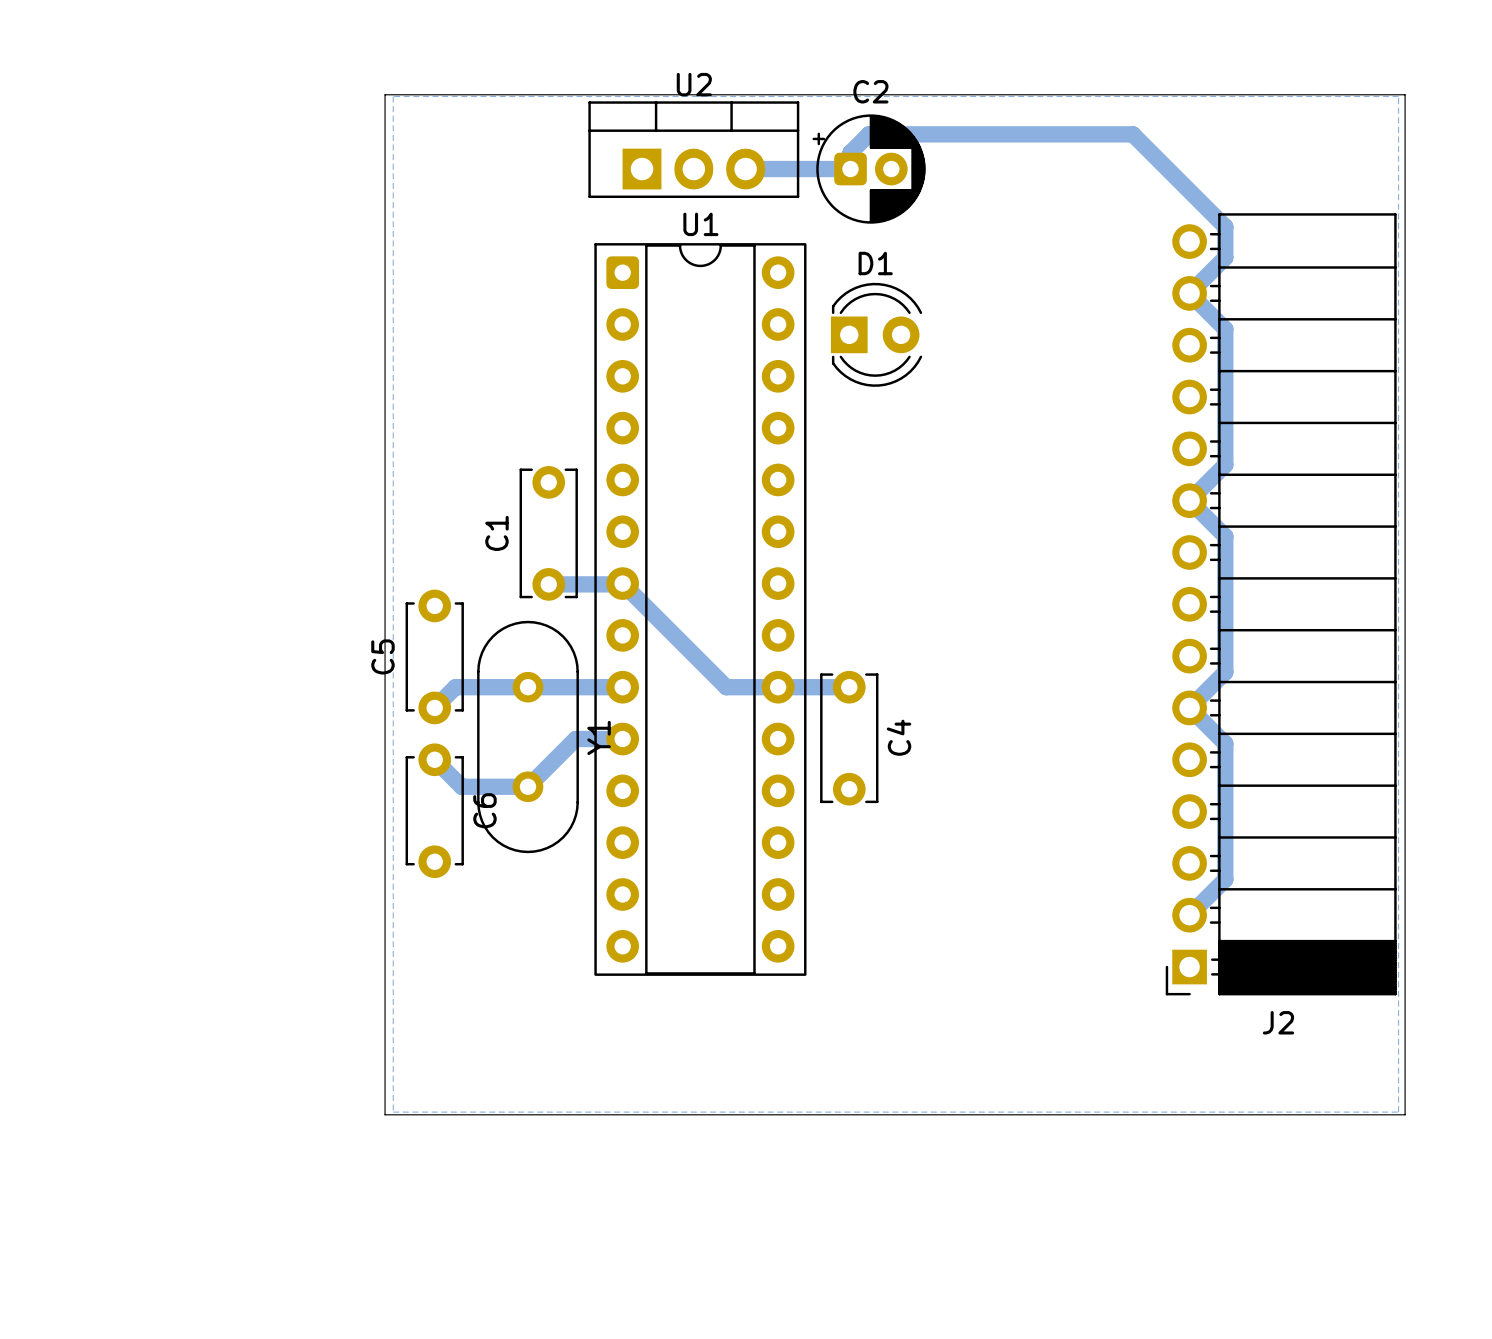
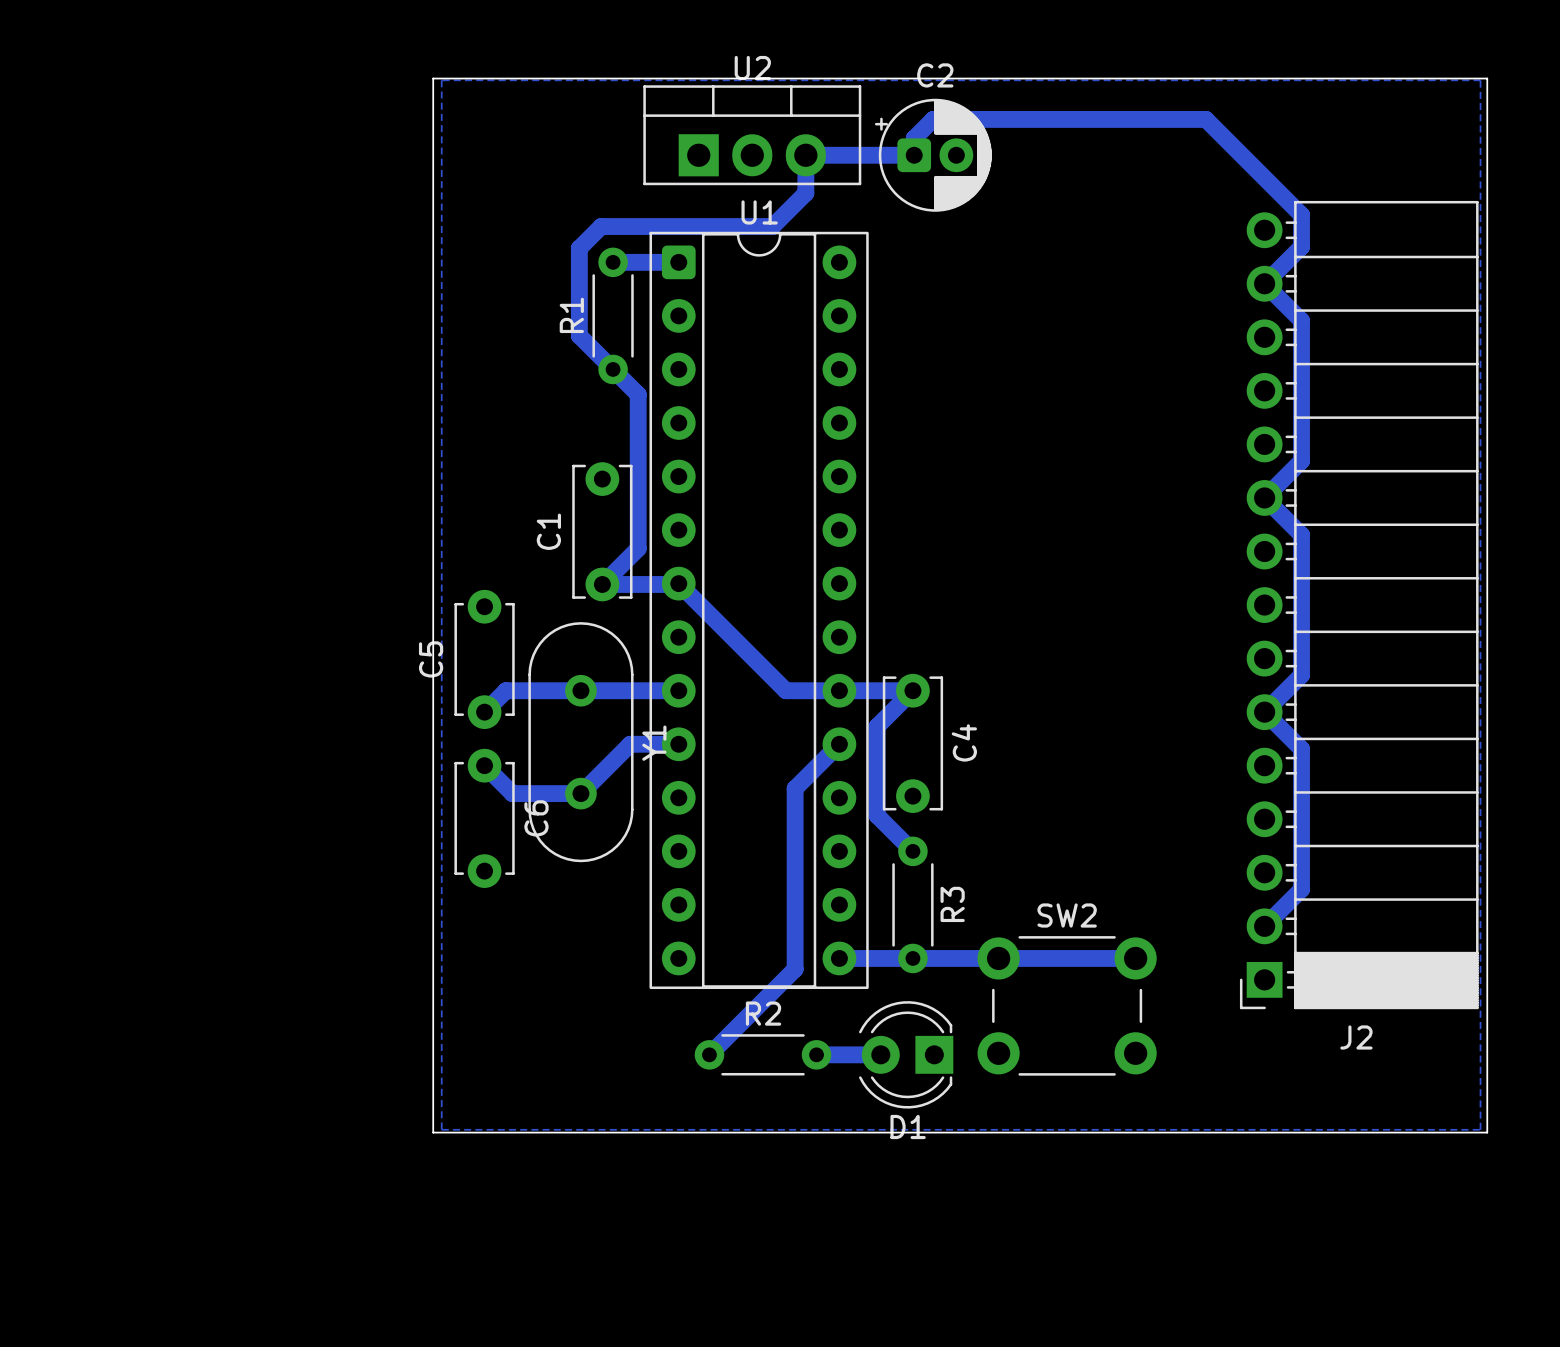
bottom track: none -> (805, 155) (805, 193) (772, 226) (601, 226) (579, 248) (579, 335) (638, 394) (638, 548) (602, 584)
bottom track: none -> (613, 262) (678, 262)
R1: none -> (613, 315)
D1 rotation: 0° (876, 334) -> 180° (906, 1054)
D1 position: (876, 334) -> (906, 1054)
bottom track: none -> (912, 690) (877, 726) (877, 815) (912, 851)
bottom track: none -> (839, 744) (795, 788) (795, 969) (709, 1054)
R3: none -> (912, 904)
bottom track: none -> (839, 958) (1135, 958)
SW2: none -> (1067, 1005)
R2: none -> (763, 1054)
bottom track: none -> (816, 1054) (880, 1054)

